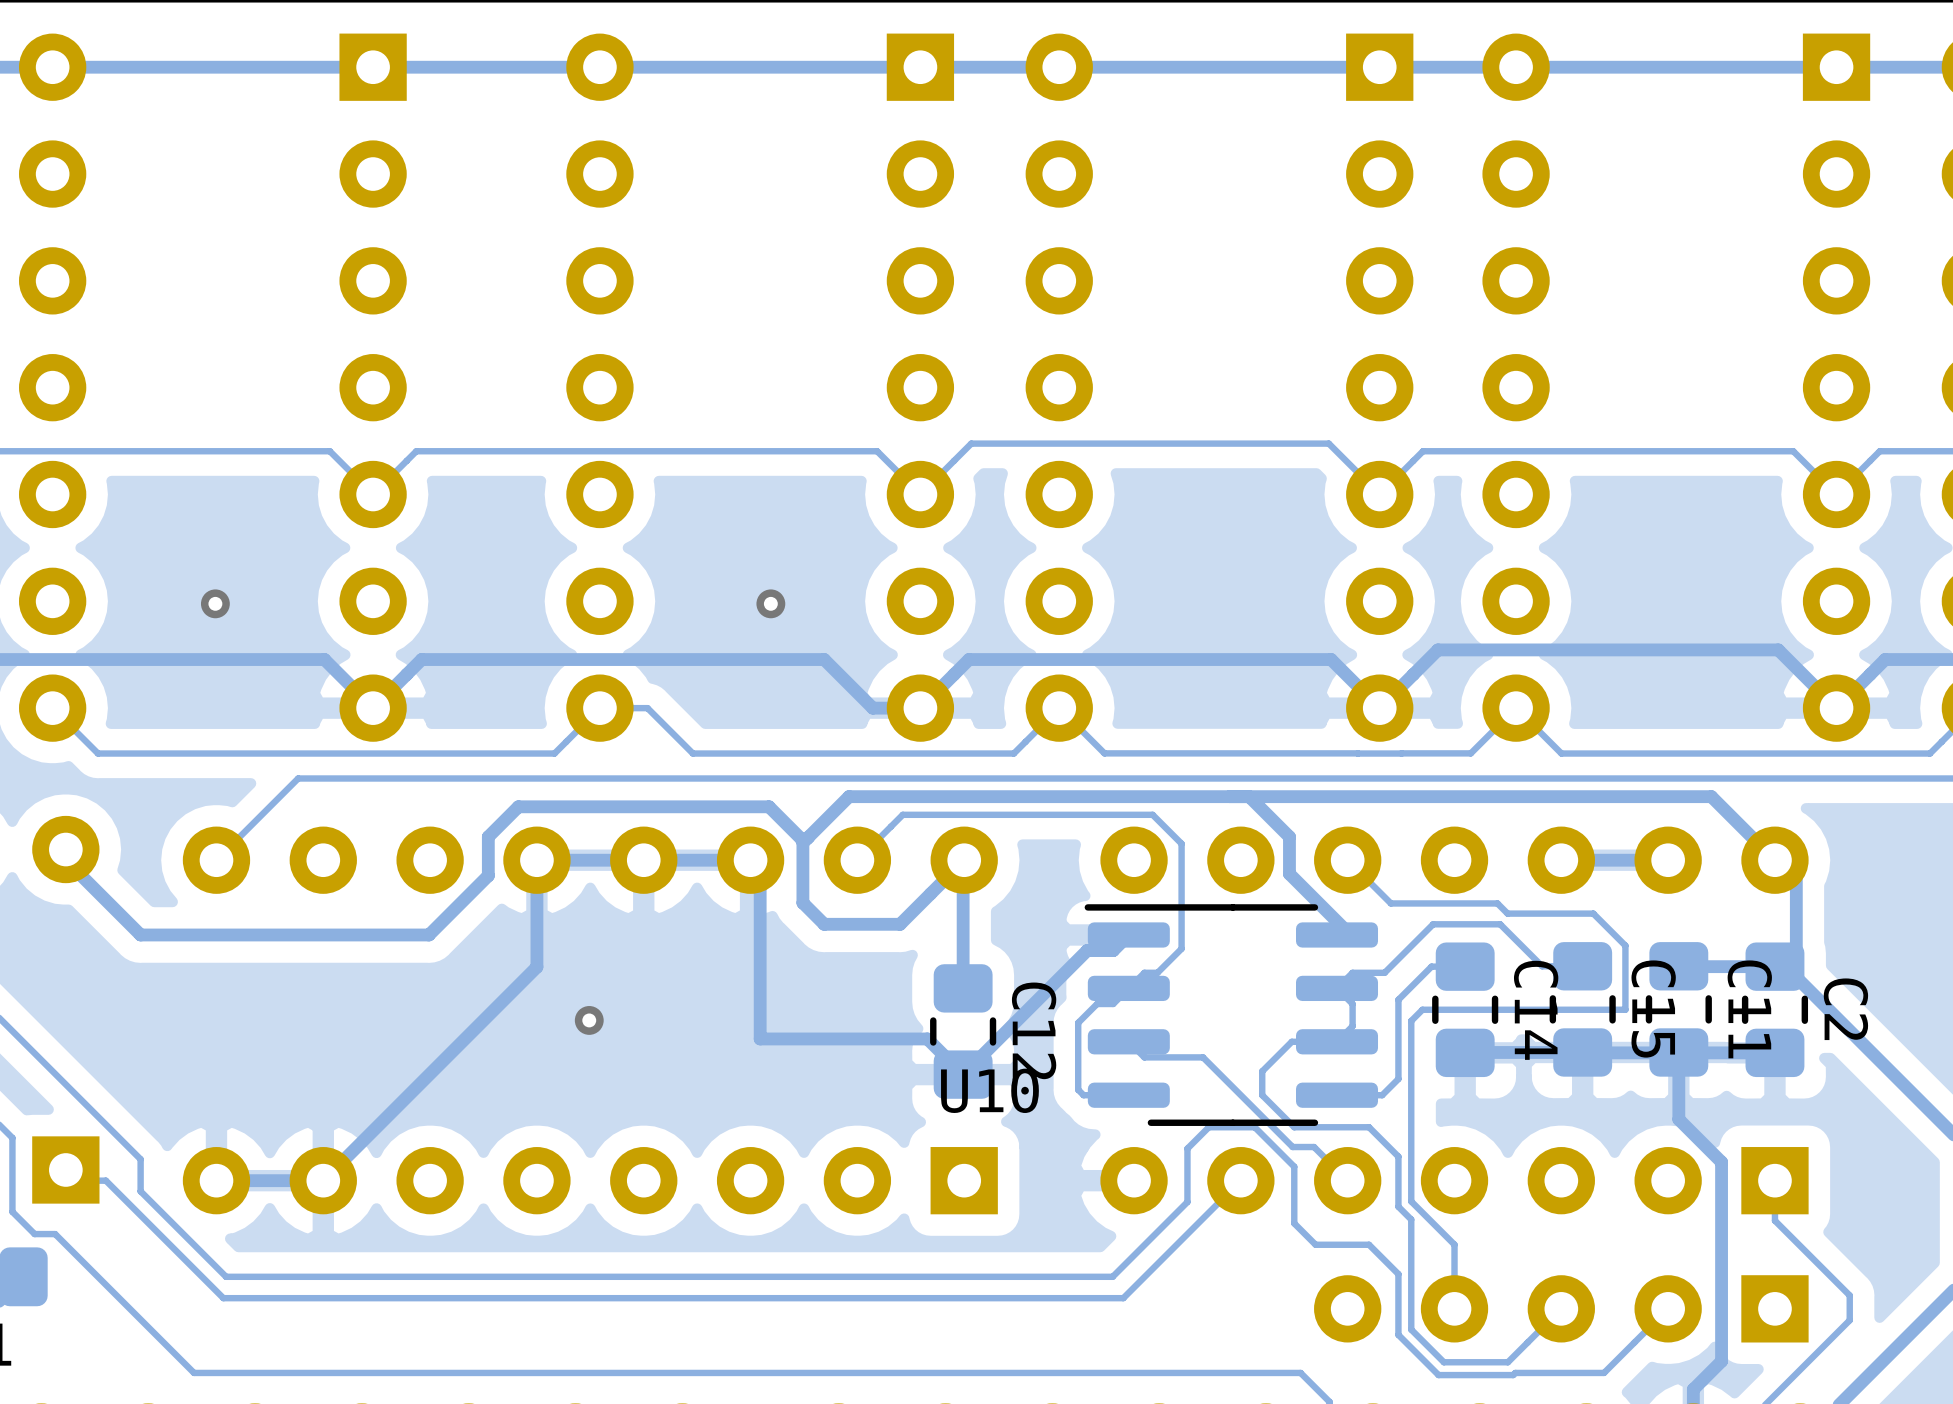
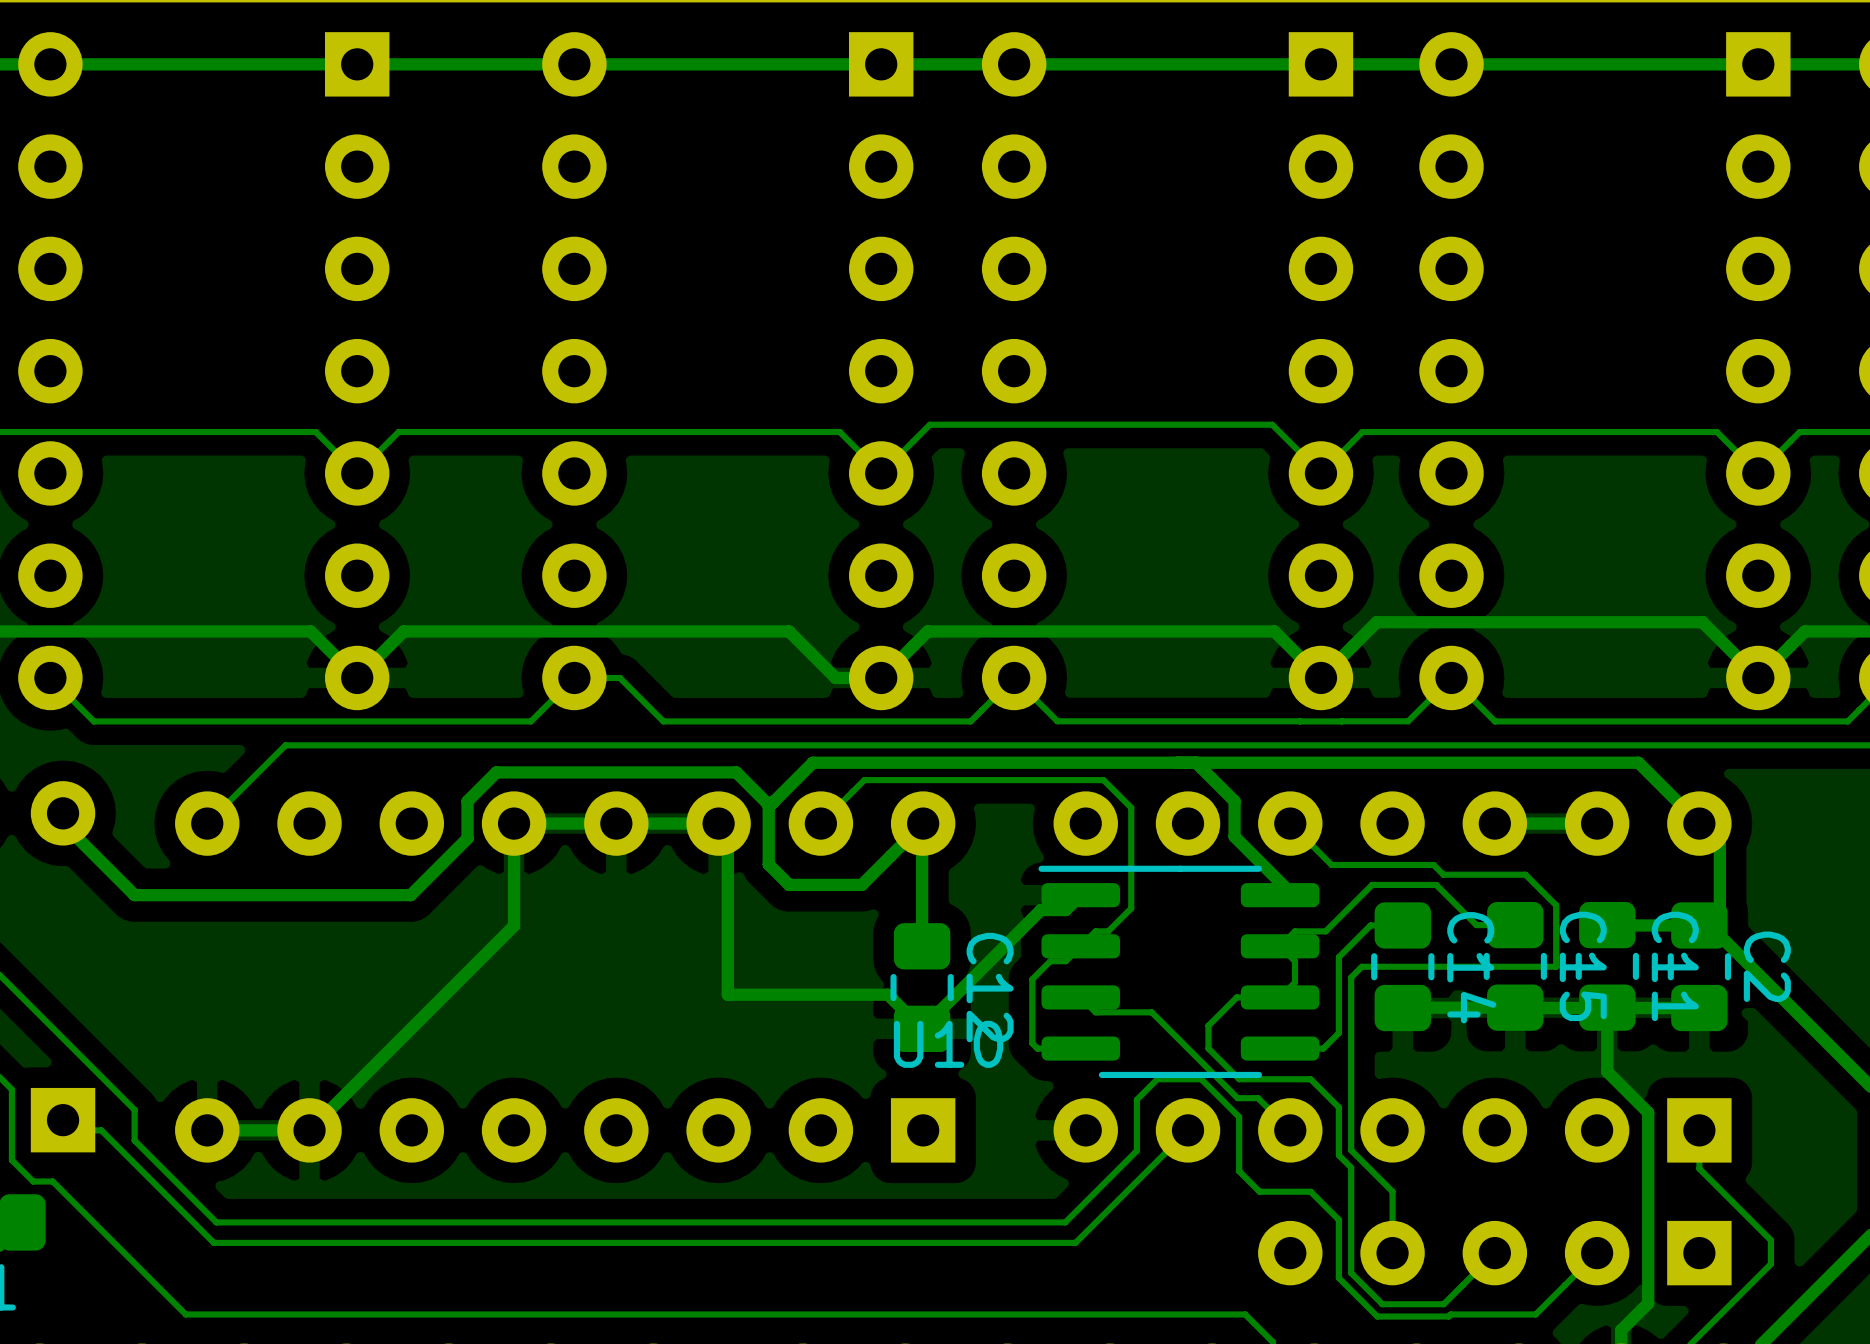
via: (215, 603) -> none
via: (770, 603) -> none
via: (589, 1020) -> none

